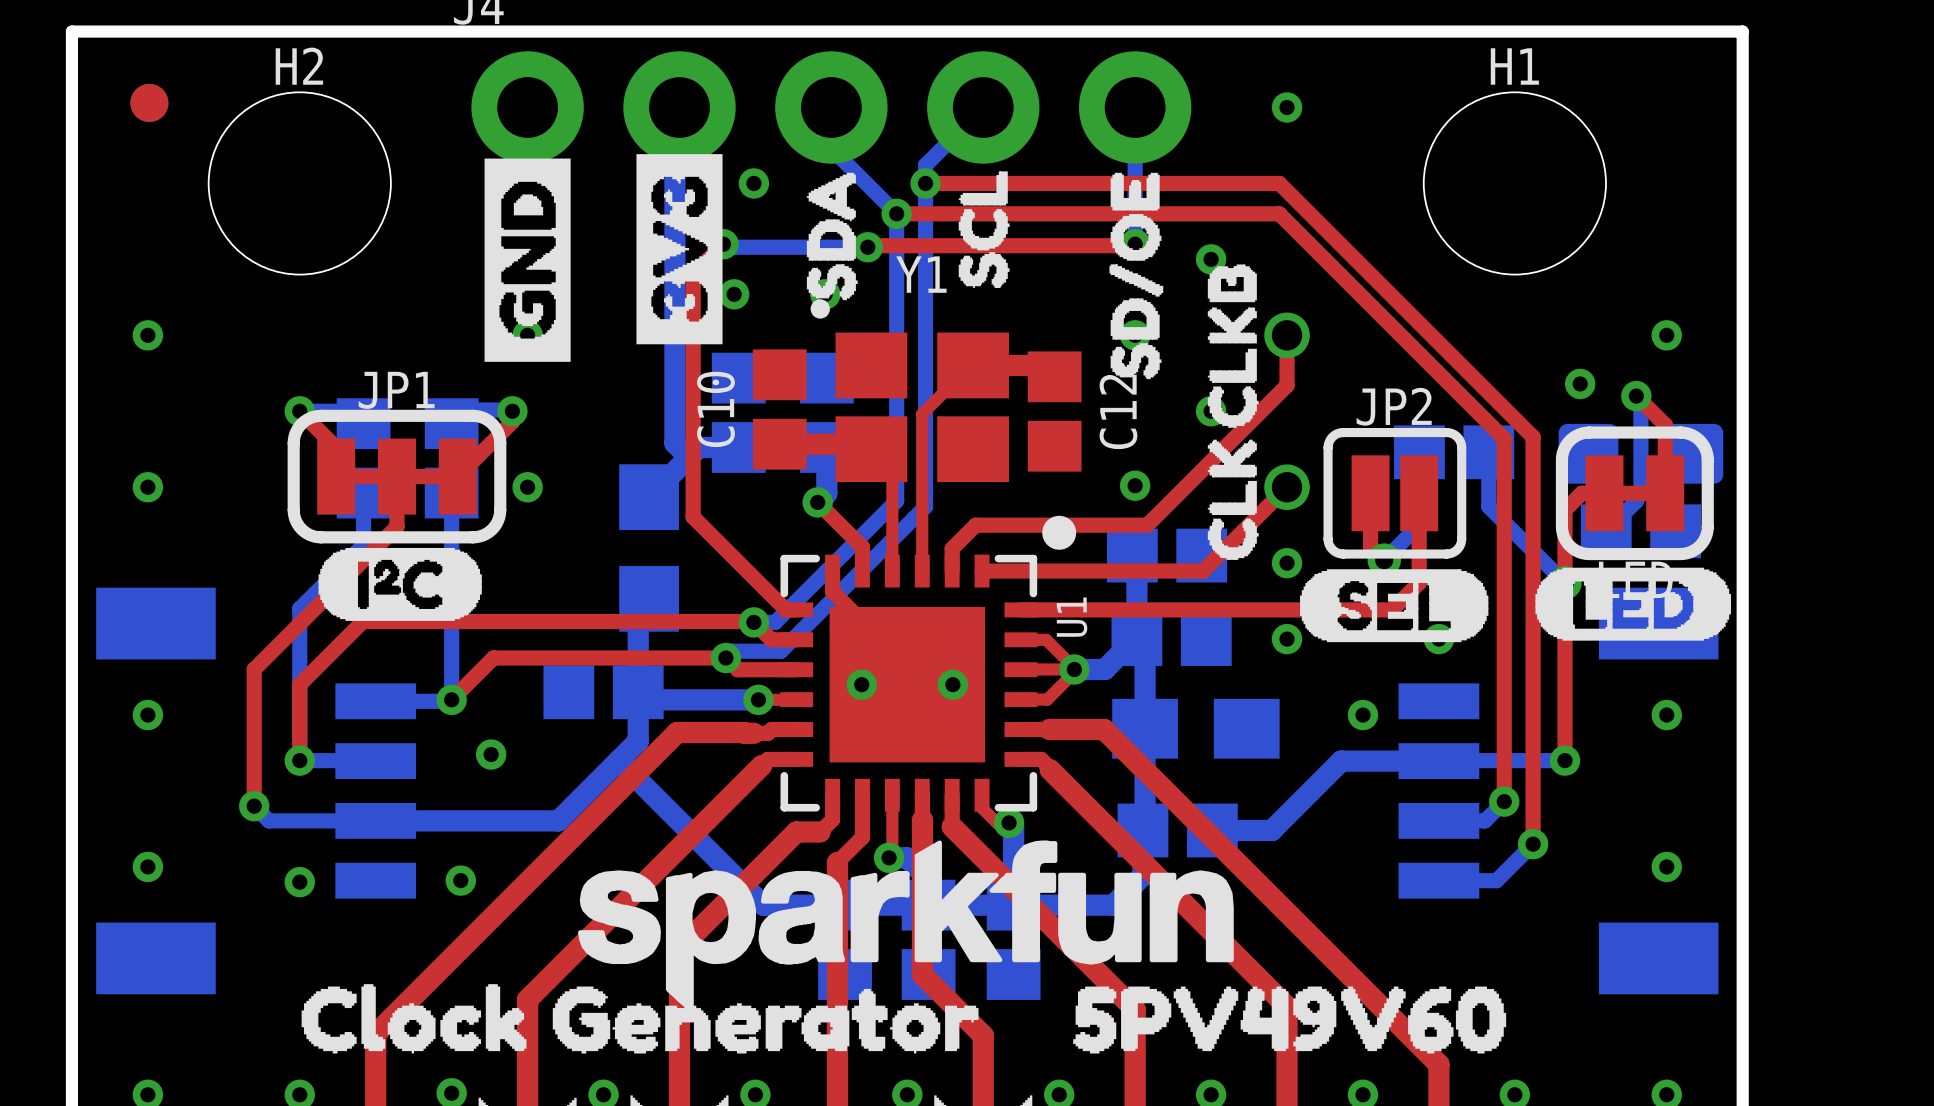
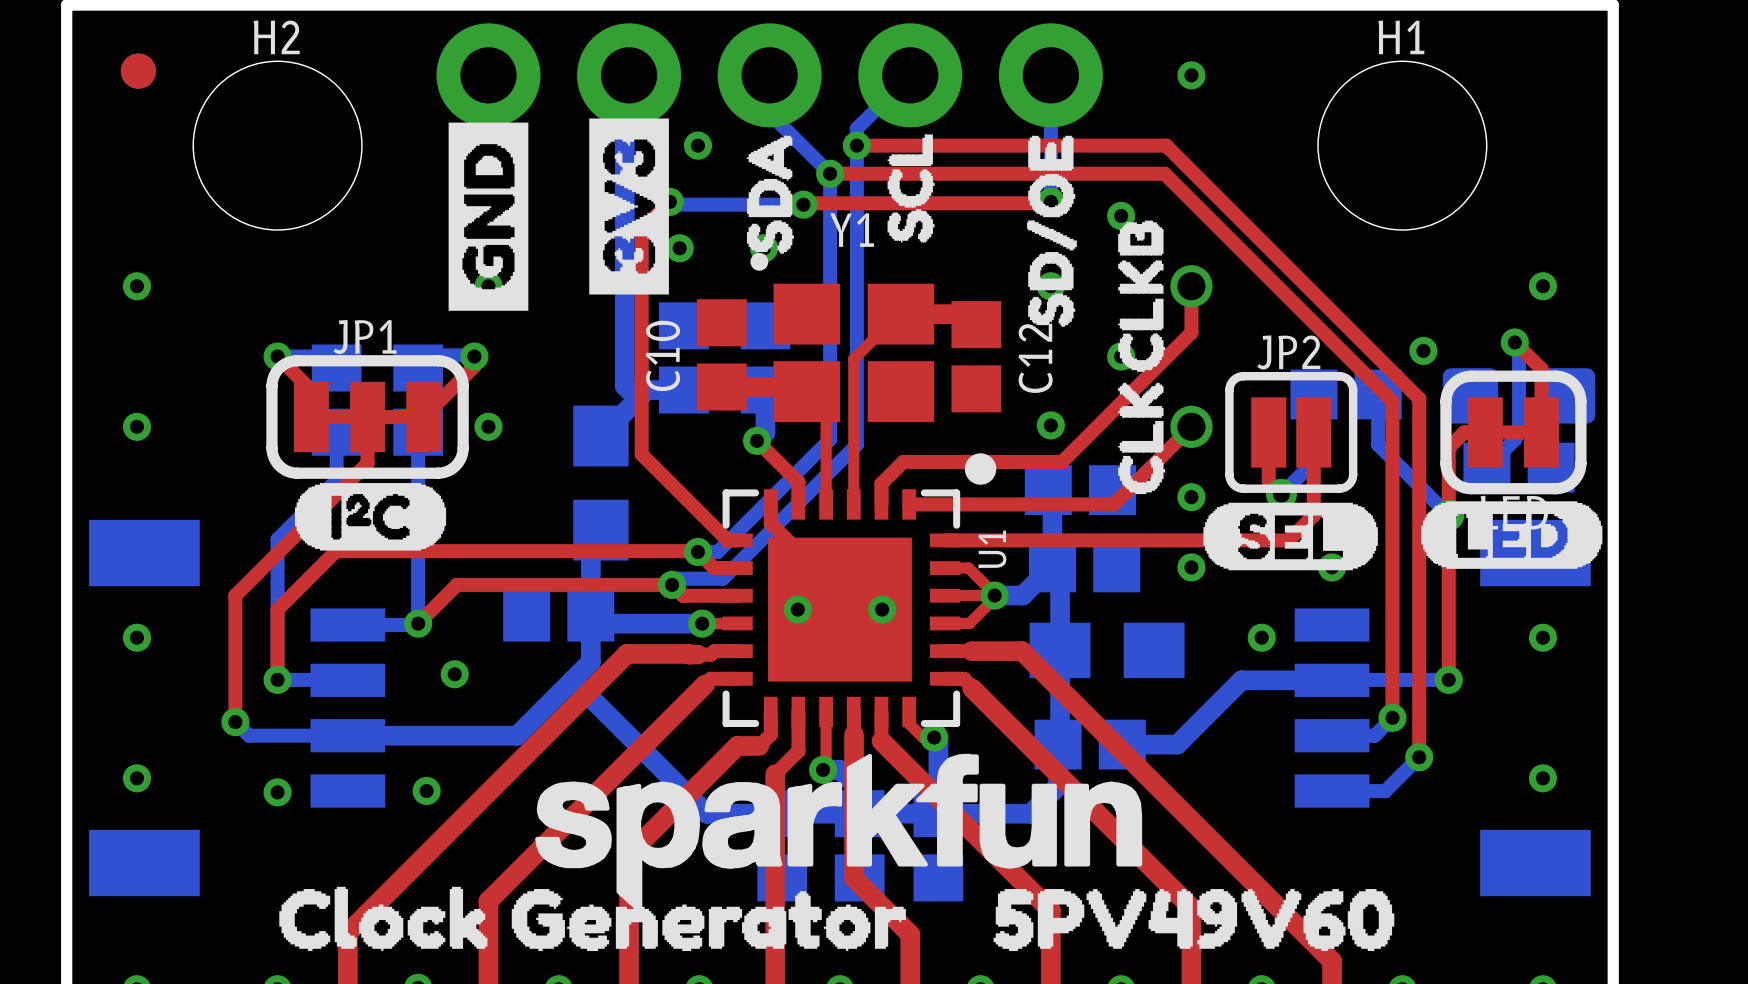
top track: (1259, 183) (1279, 183) (1533, 437) (1533, 456) -> (1166, 145) (1419, 398)
top track: (1258, 213) (1279, 213) (1504, 438) (1504, 459) -> (1164, 173) (1392, 401)
via position: (1580, 383) -> (1423, 350)

